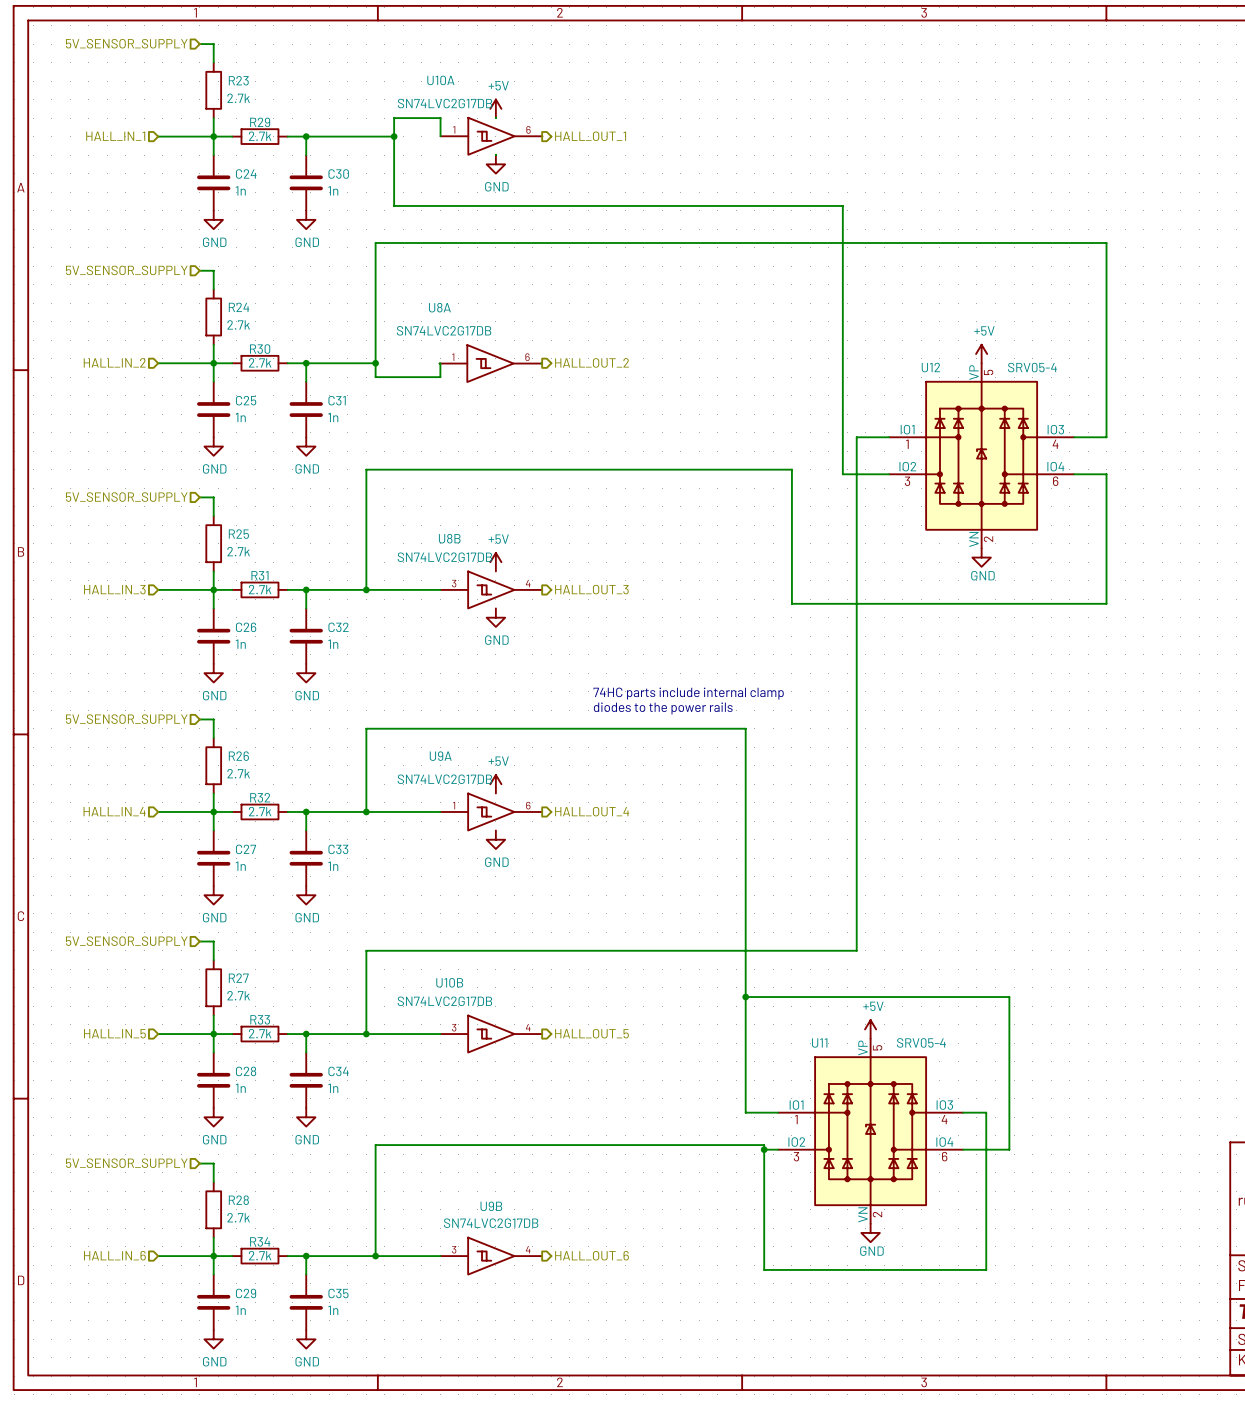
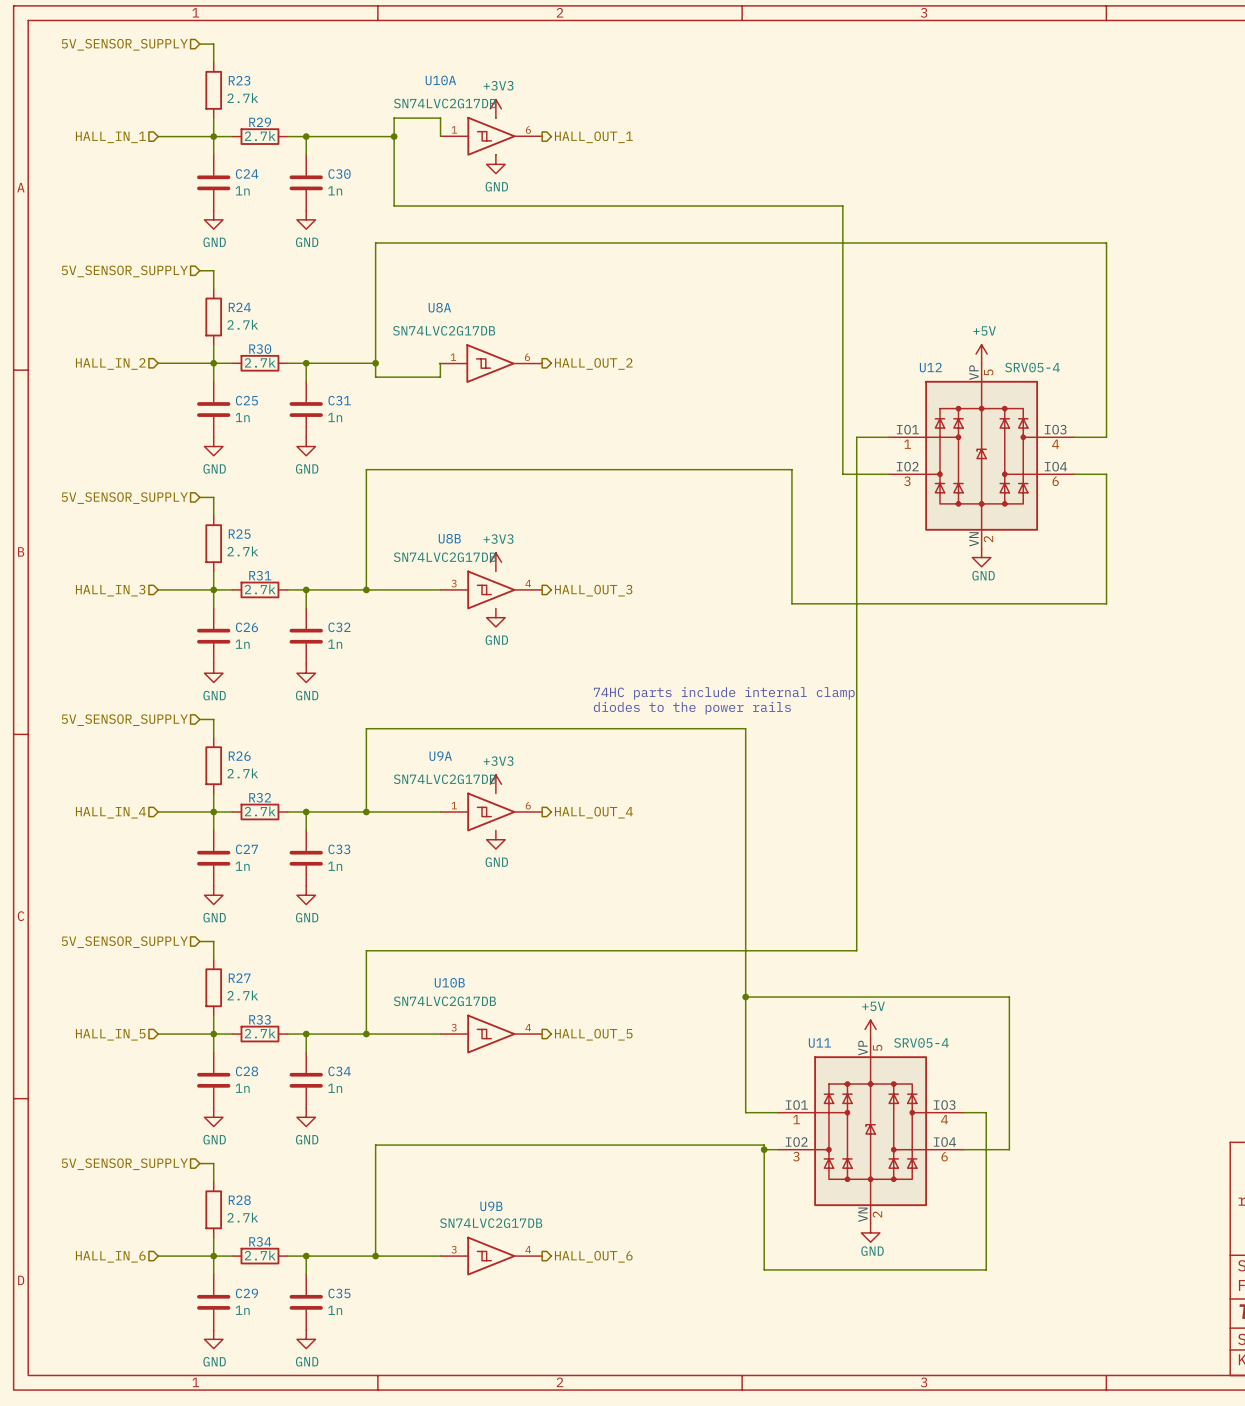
power symbol: +5V (495, 108) -> +3V3 (495, 108)
power symbol: +5V (495, 562) -> +3V3 (495, 562)
power symbol: +5V (495, 784) -> +3V3 (495, 784)

